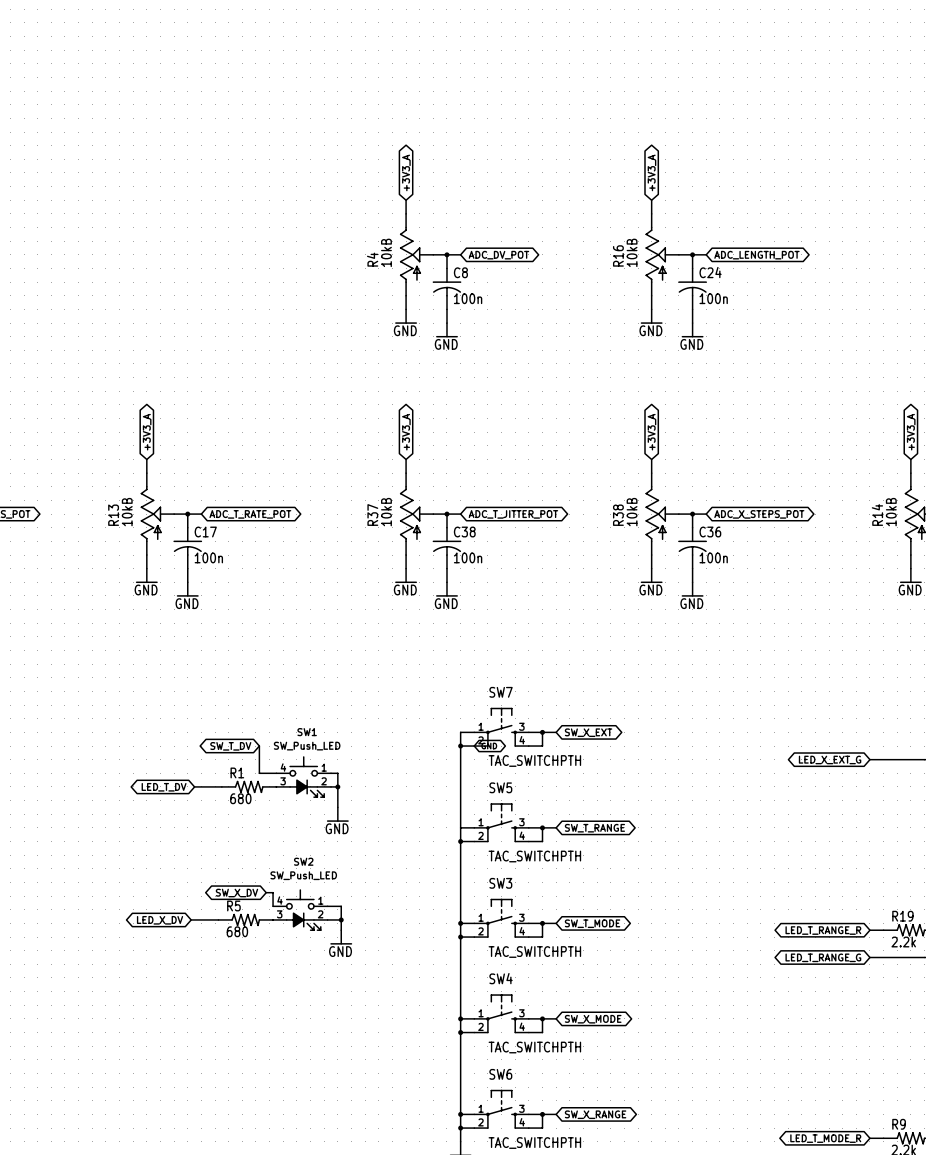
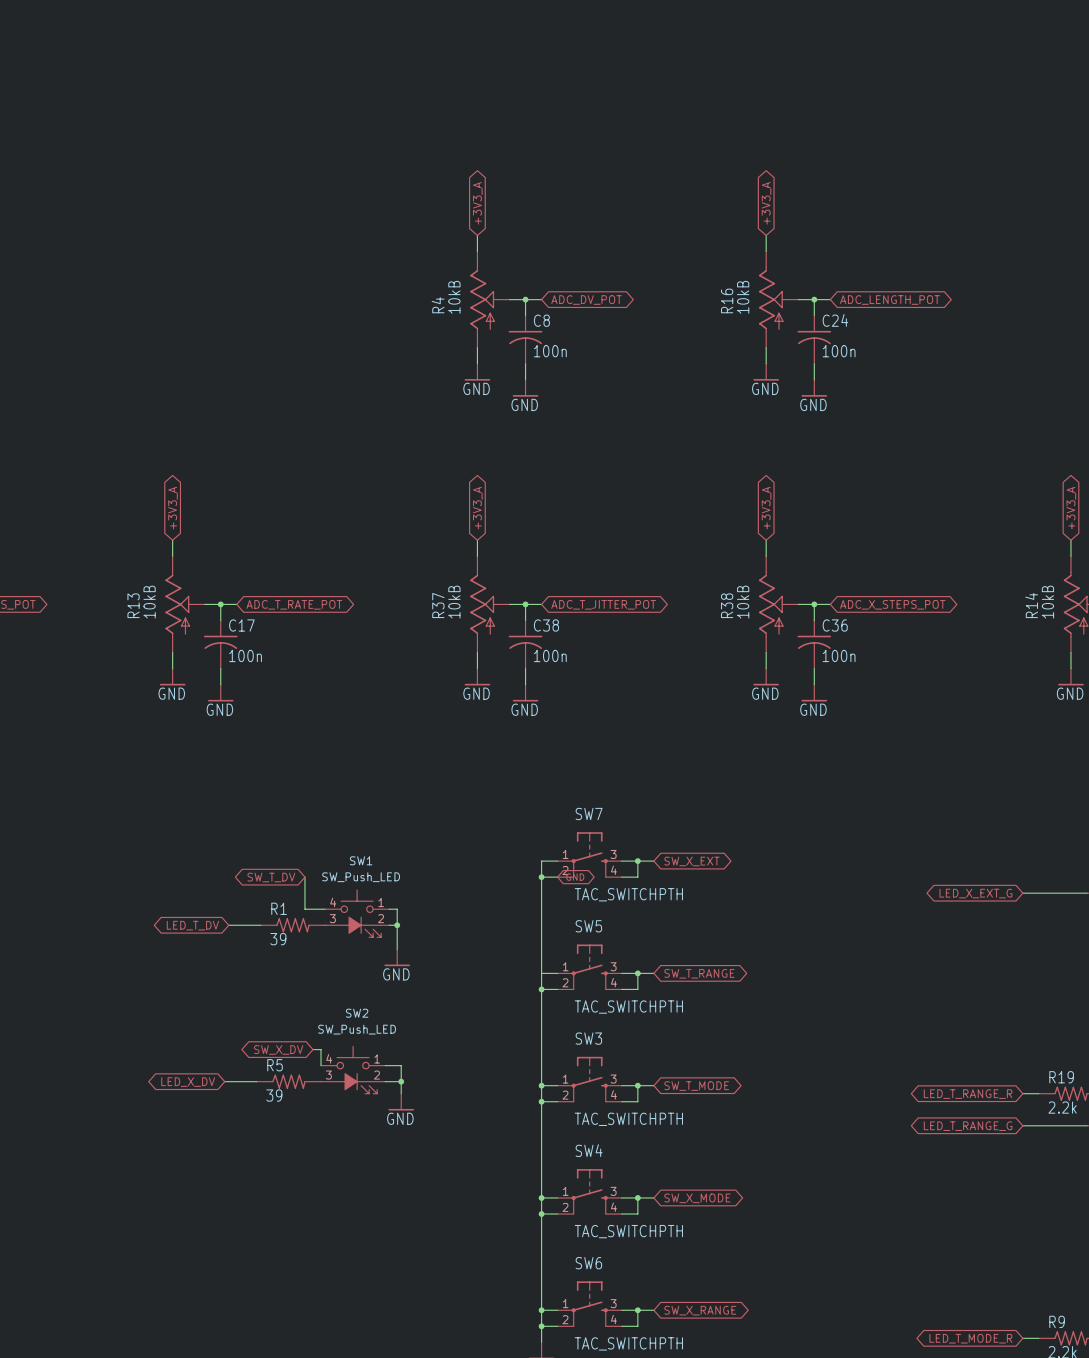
R1 value: 680 (240, 798) -> 39 (278, 939)
R5 value: 680 (237, 931) -> 39 (274, 1095)

